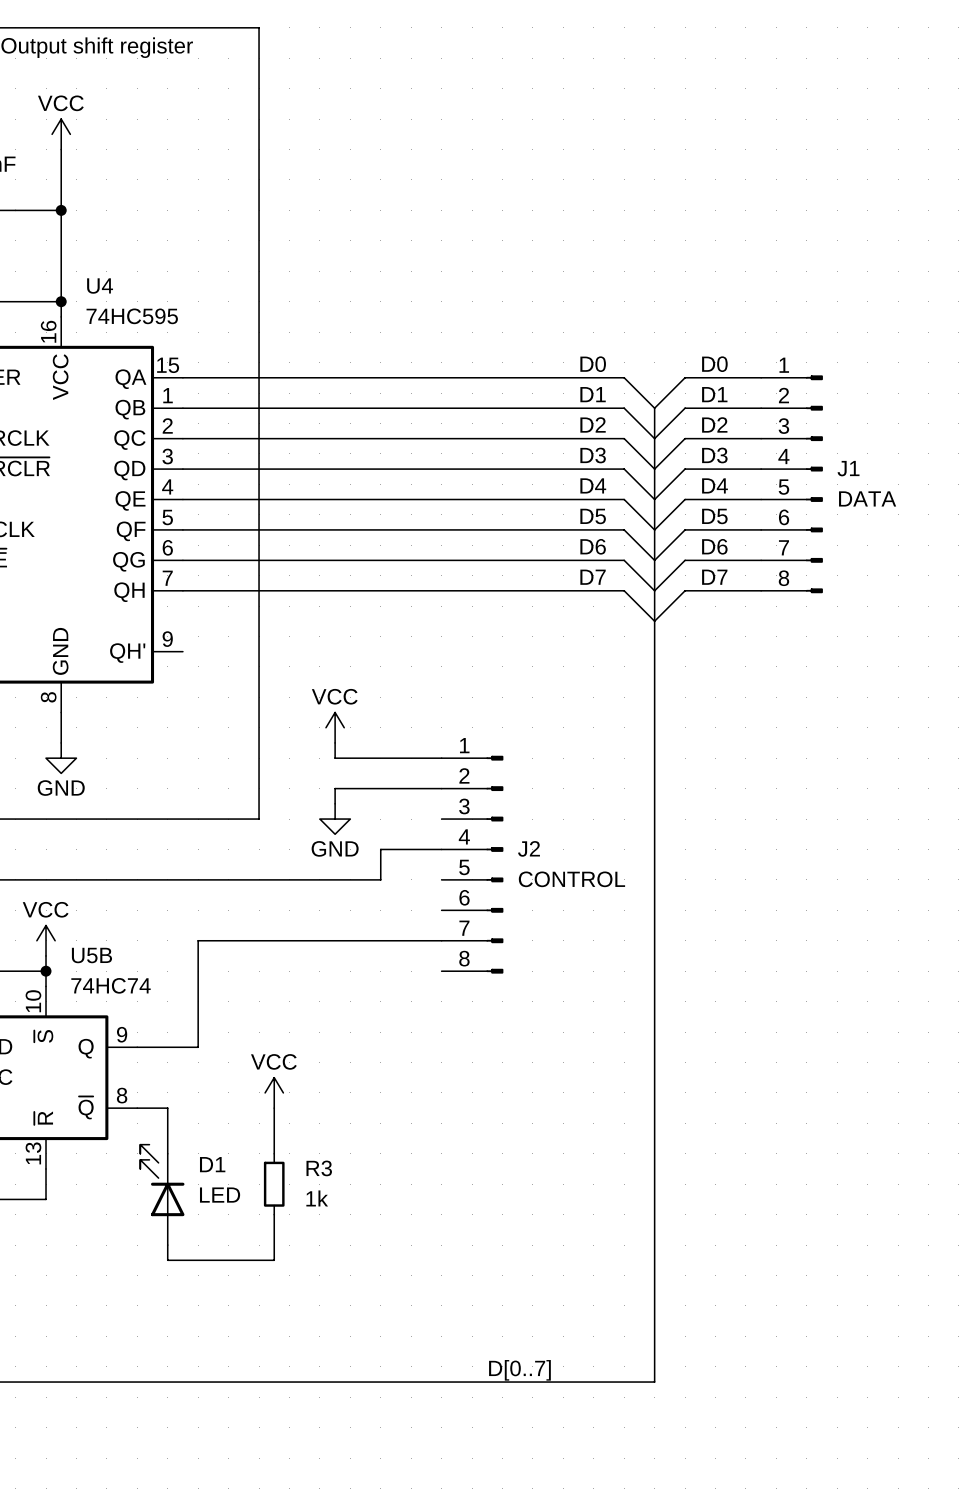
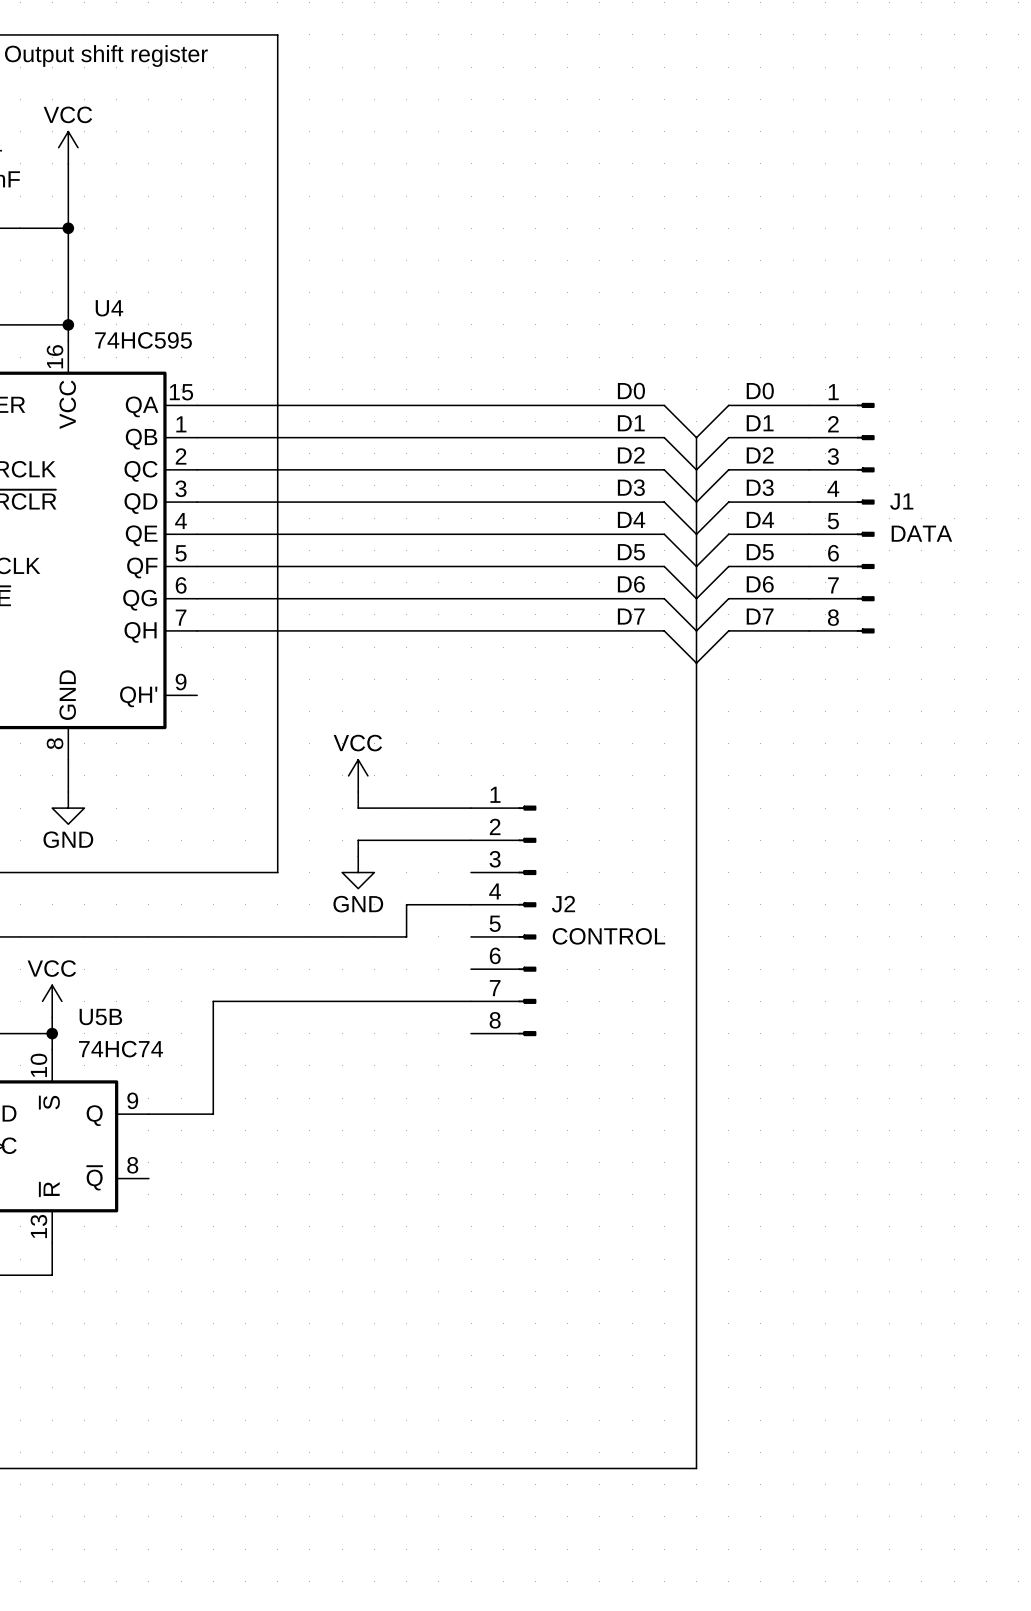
power symbol: VCC (274, 1092) -> none
wire: (137, 1108) (167, 1108) (167, 1153) -> none
wire: (274, 1108) (274, 1153) -> none
R3: 1k (274, 1184) -> none
D1: LED (162, 1194) -> none
wire: (274, 1214) (274, 1260) (167, 1260) (167, 1245) -> none
label: D[0..7] (519, 1370) -> none

